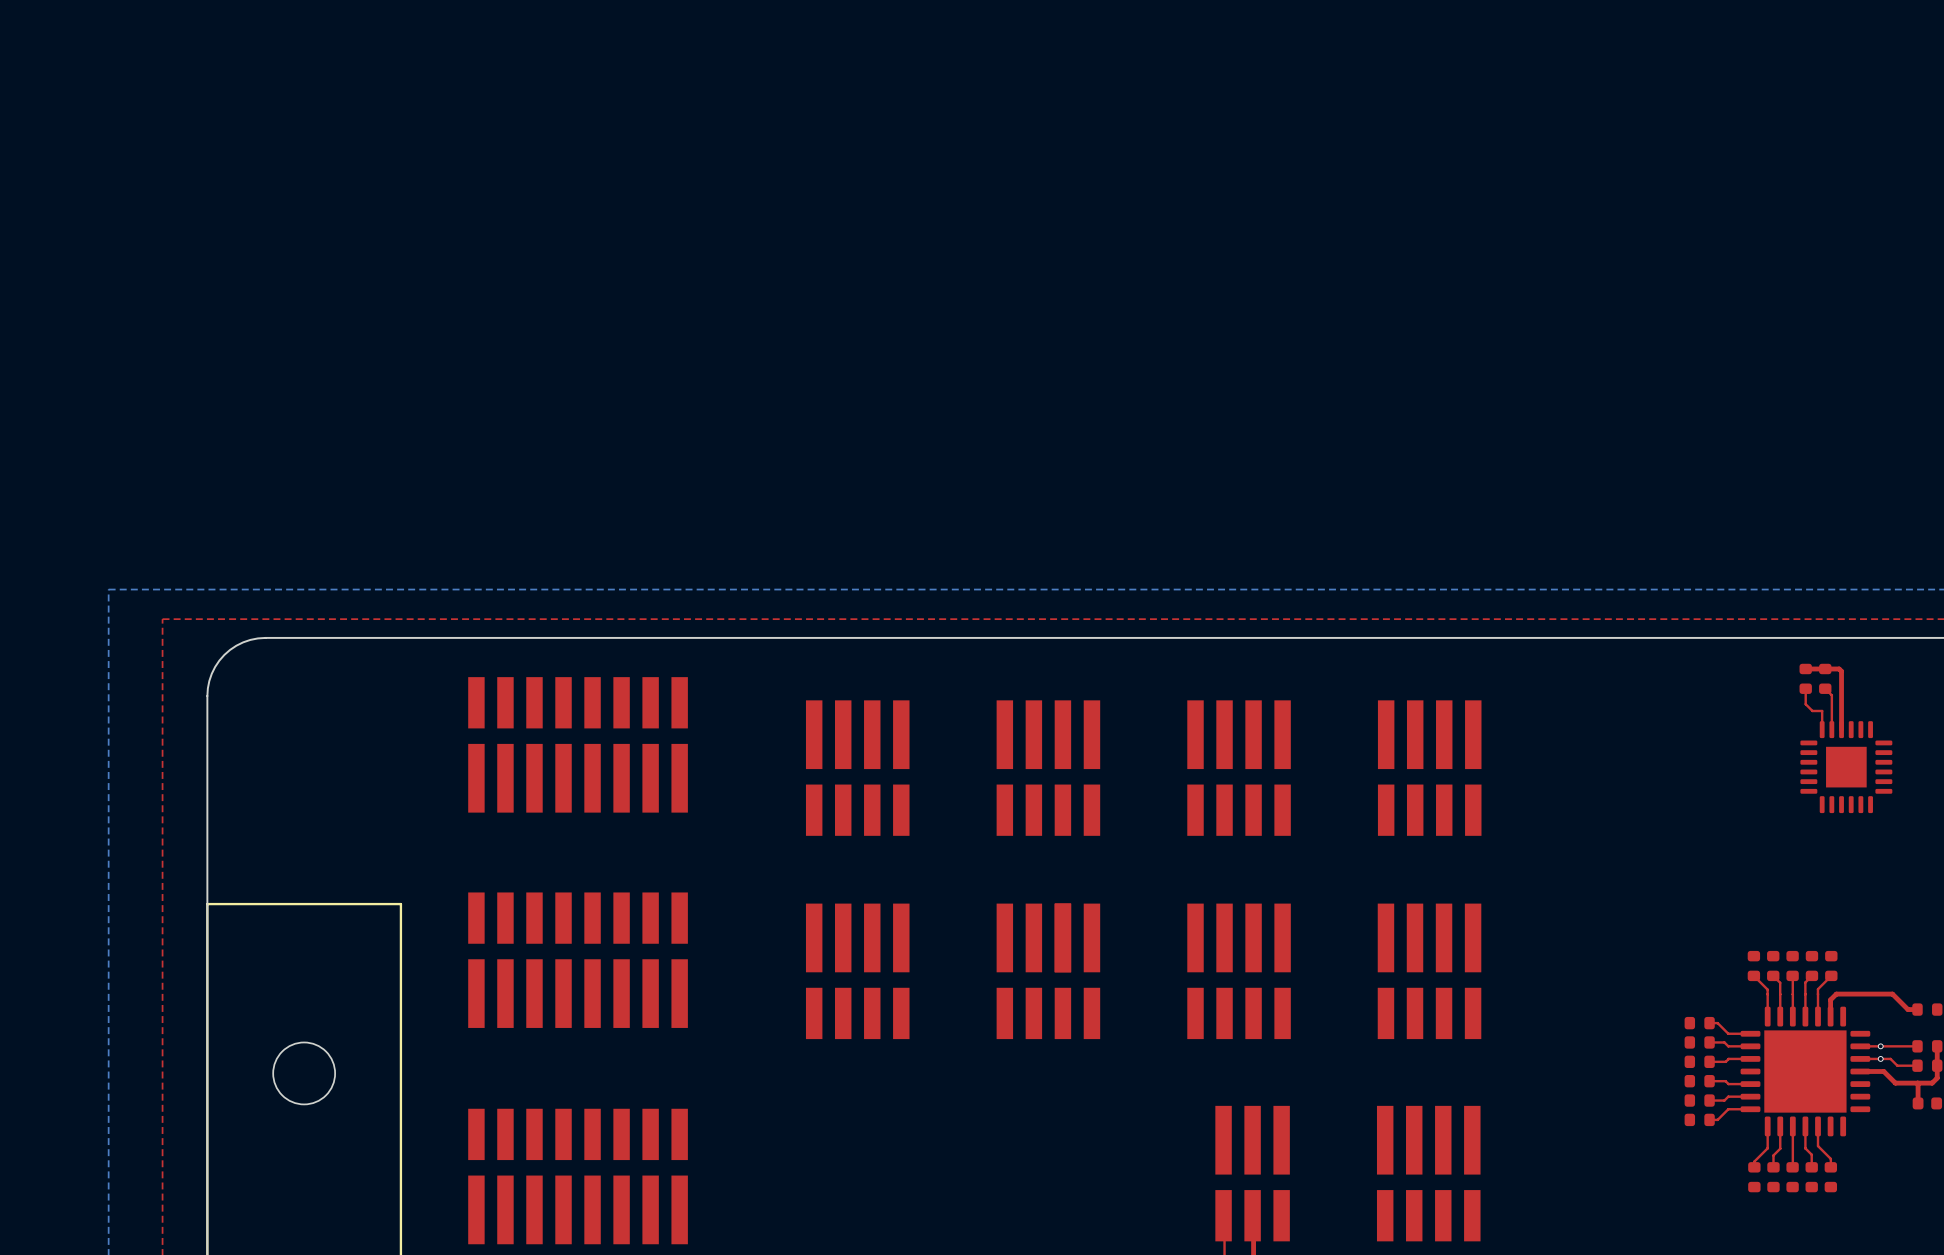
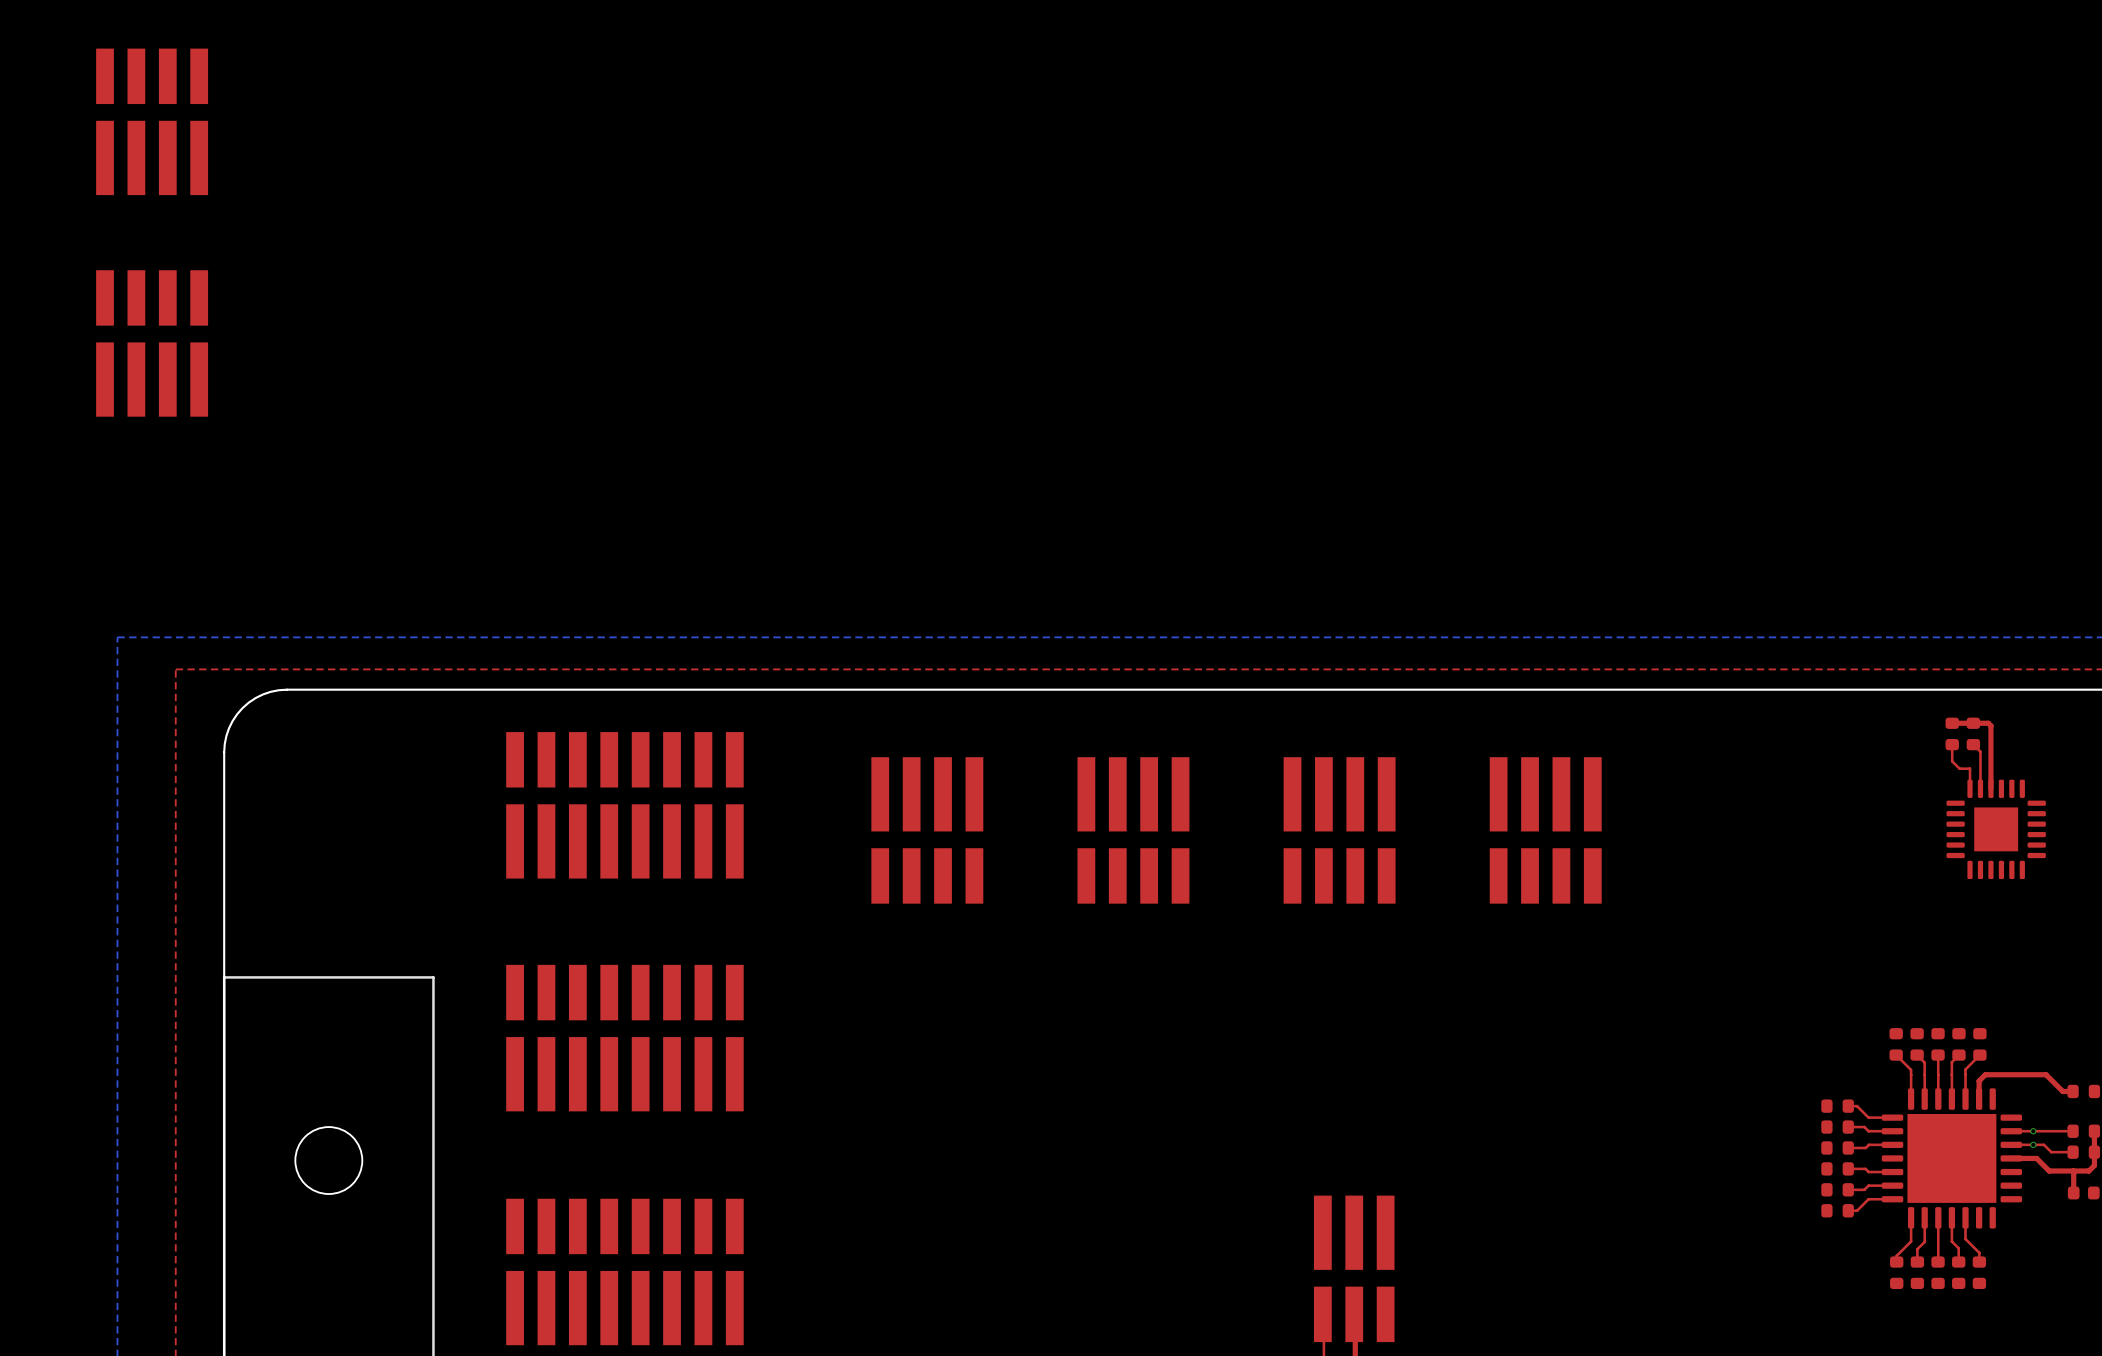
part: none -> (152, 121)
part: none -> (152, 343)
part: (1062, 937) -> none
part: (857, 971) -> none
part: (1048, 971) -> none
part: (1239, 971) -> none
part: (1429, 971) -> none
part: (1428, 1173) -> none

